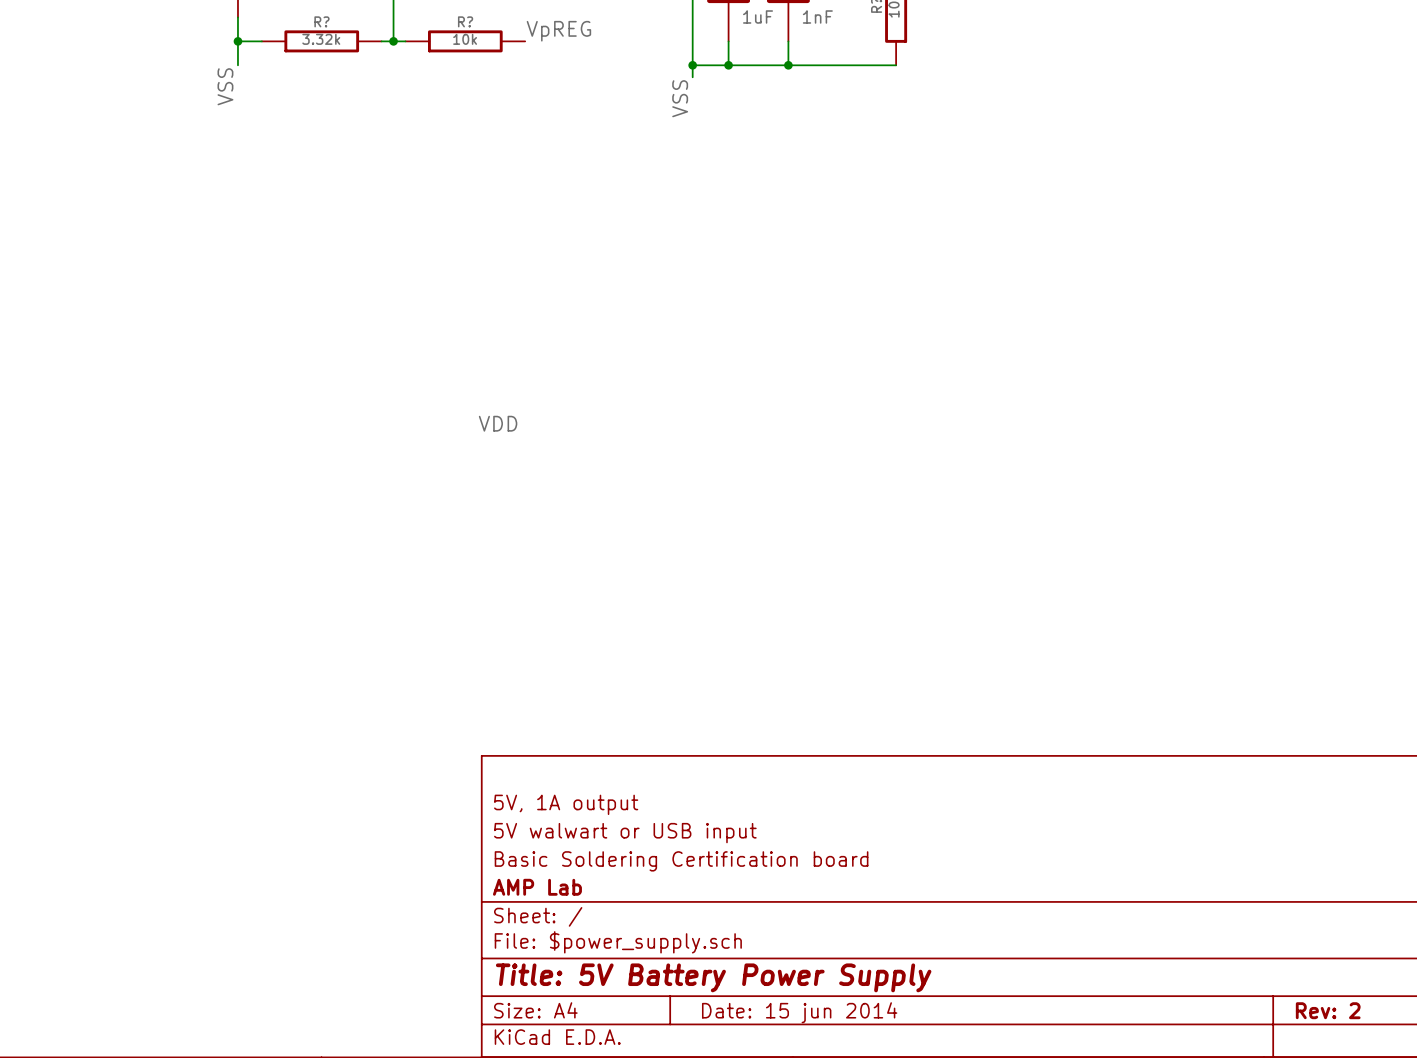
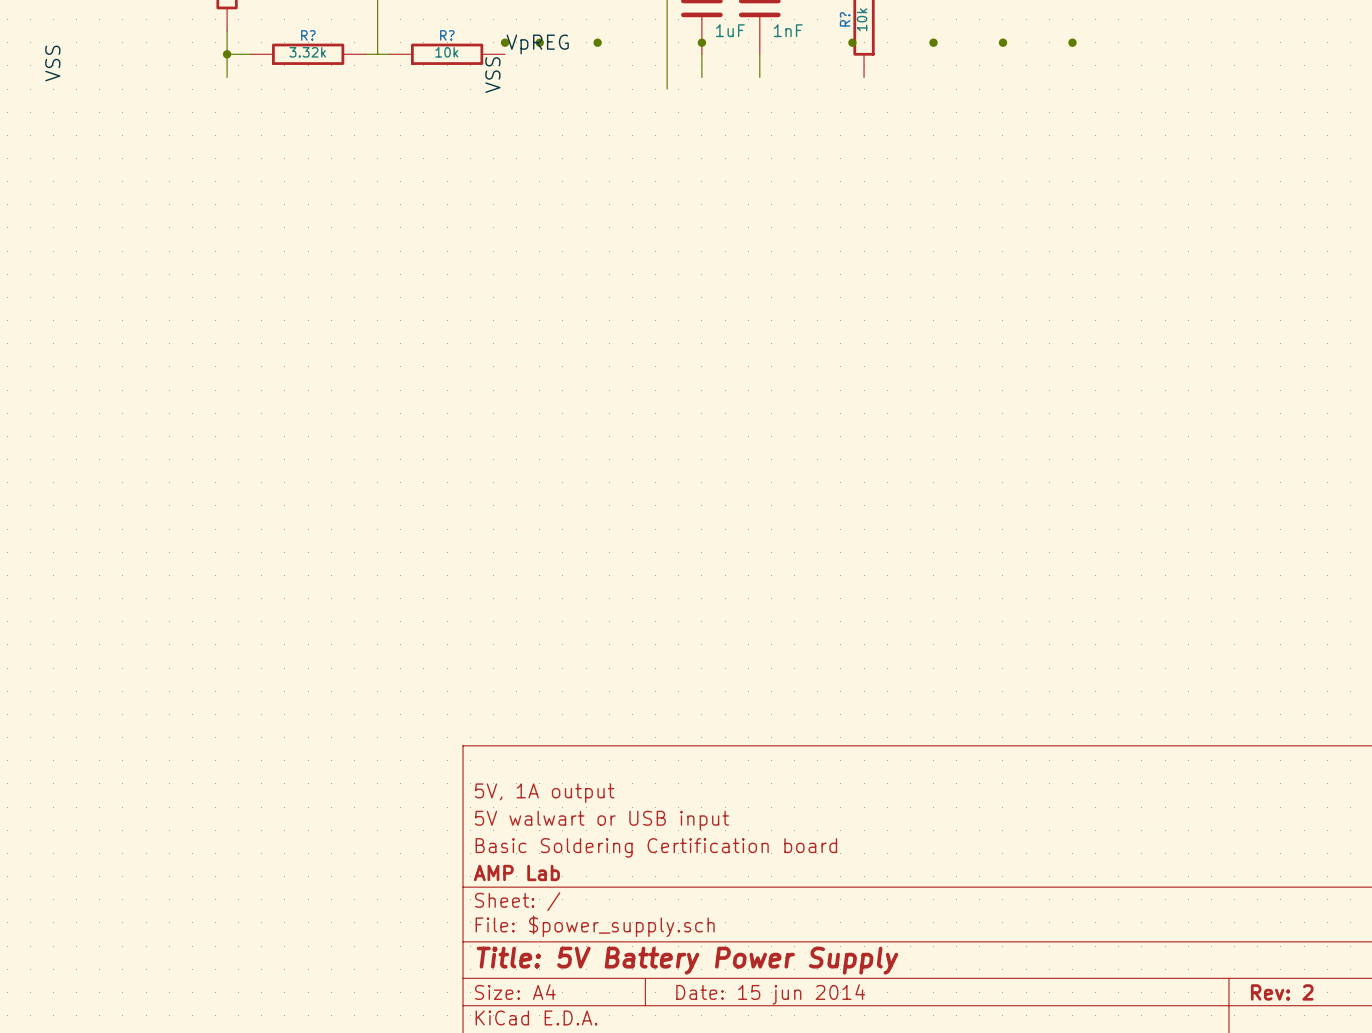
junction: none -> (505, 42)
junction: none -> (539, 42)
junction: none -> (597, 42)
junction: none -> (701, 42)
junction: none -> (852, 42)
junction: none -> (933, 42)
junction: none -> (1002, 42)
junction: none -> (1072, 42)
junction: (393, 41) -> none
label: none -> VSS (52, 63)
label: none -> VSS (492, 75)
wire: (692, 65) (896, 65) -> none
junction: (692, 65) -> none
junction: (728, 65) -> none
junction: (788, 65) -> none
label: VSS (225, 86) -> none
label: VSS (680, 98) -> none
label: VDD (498, 423) -> none

